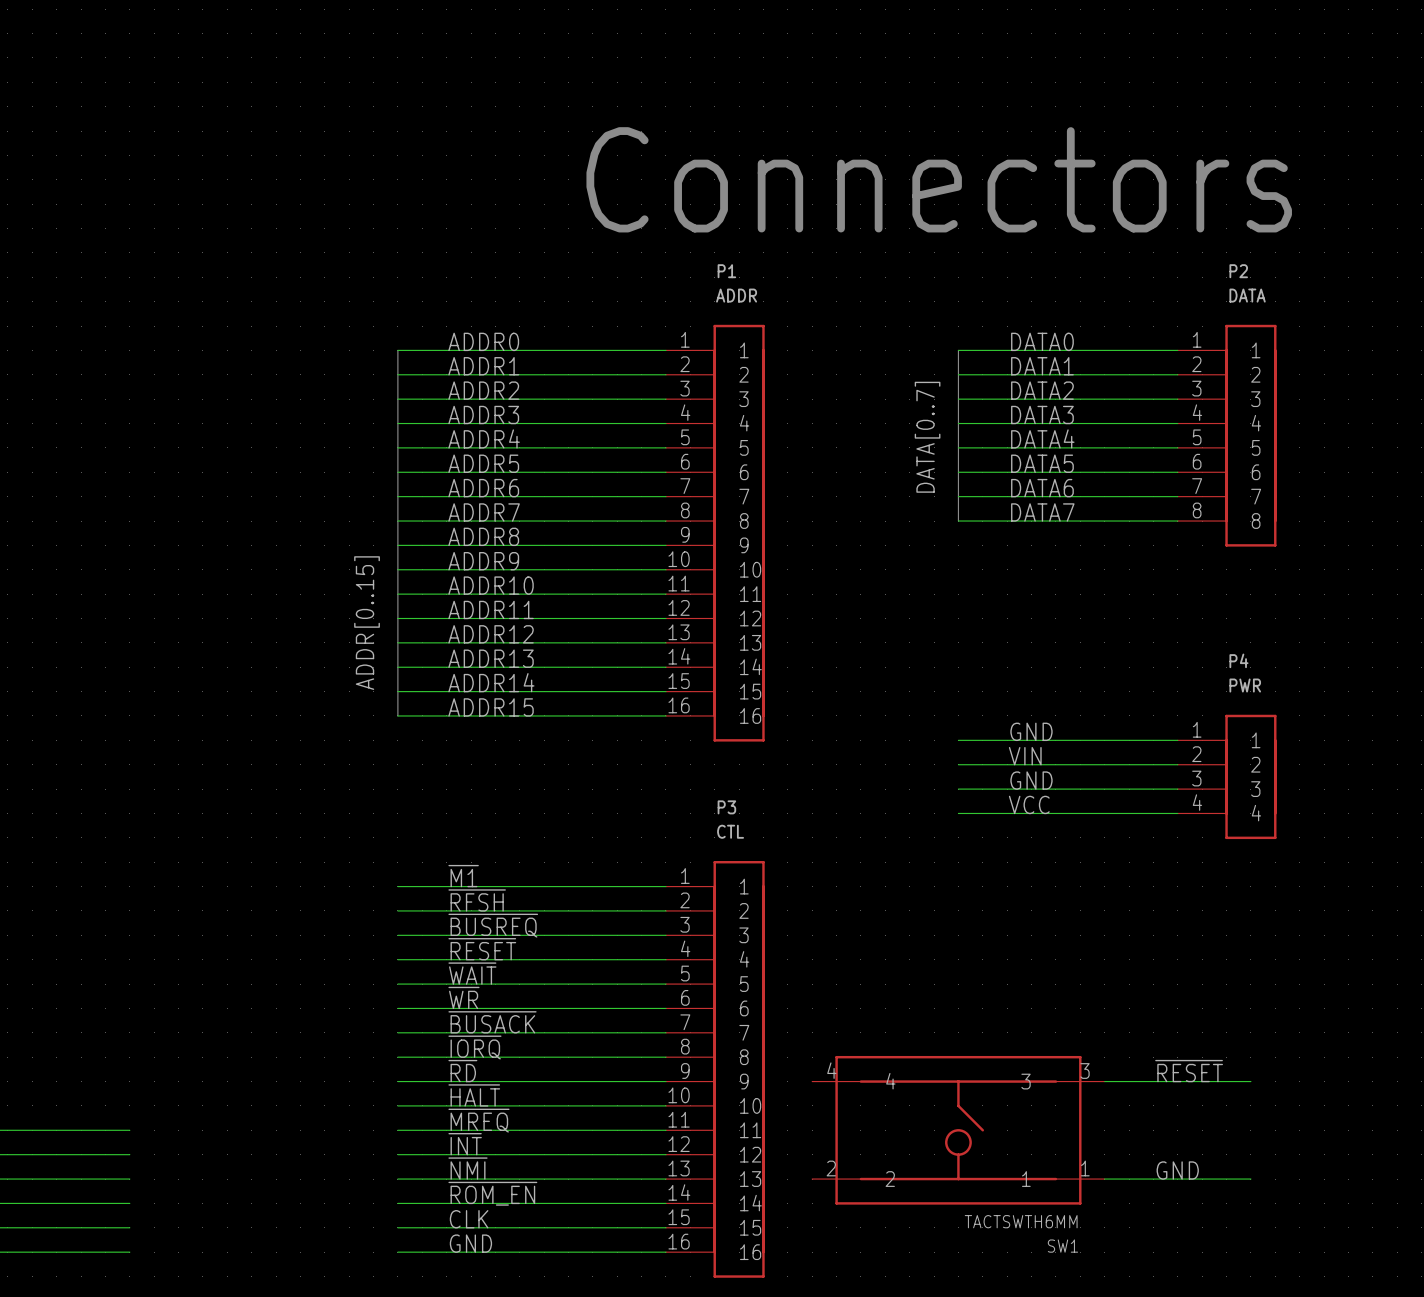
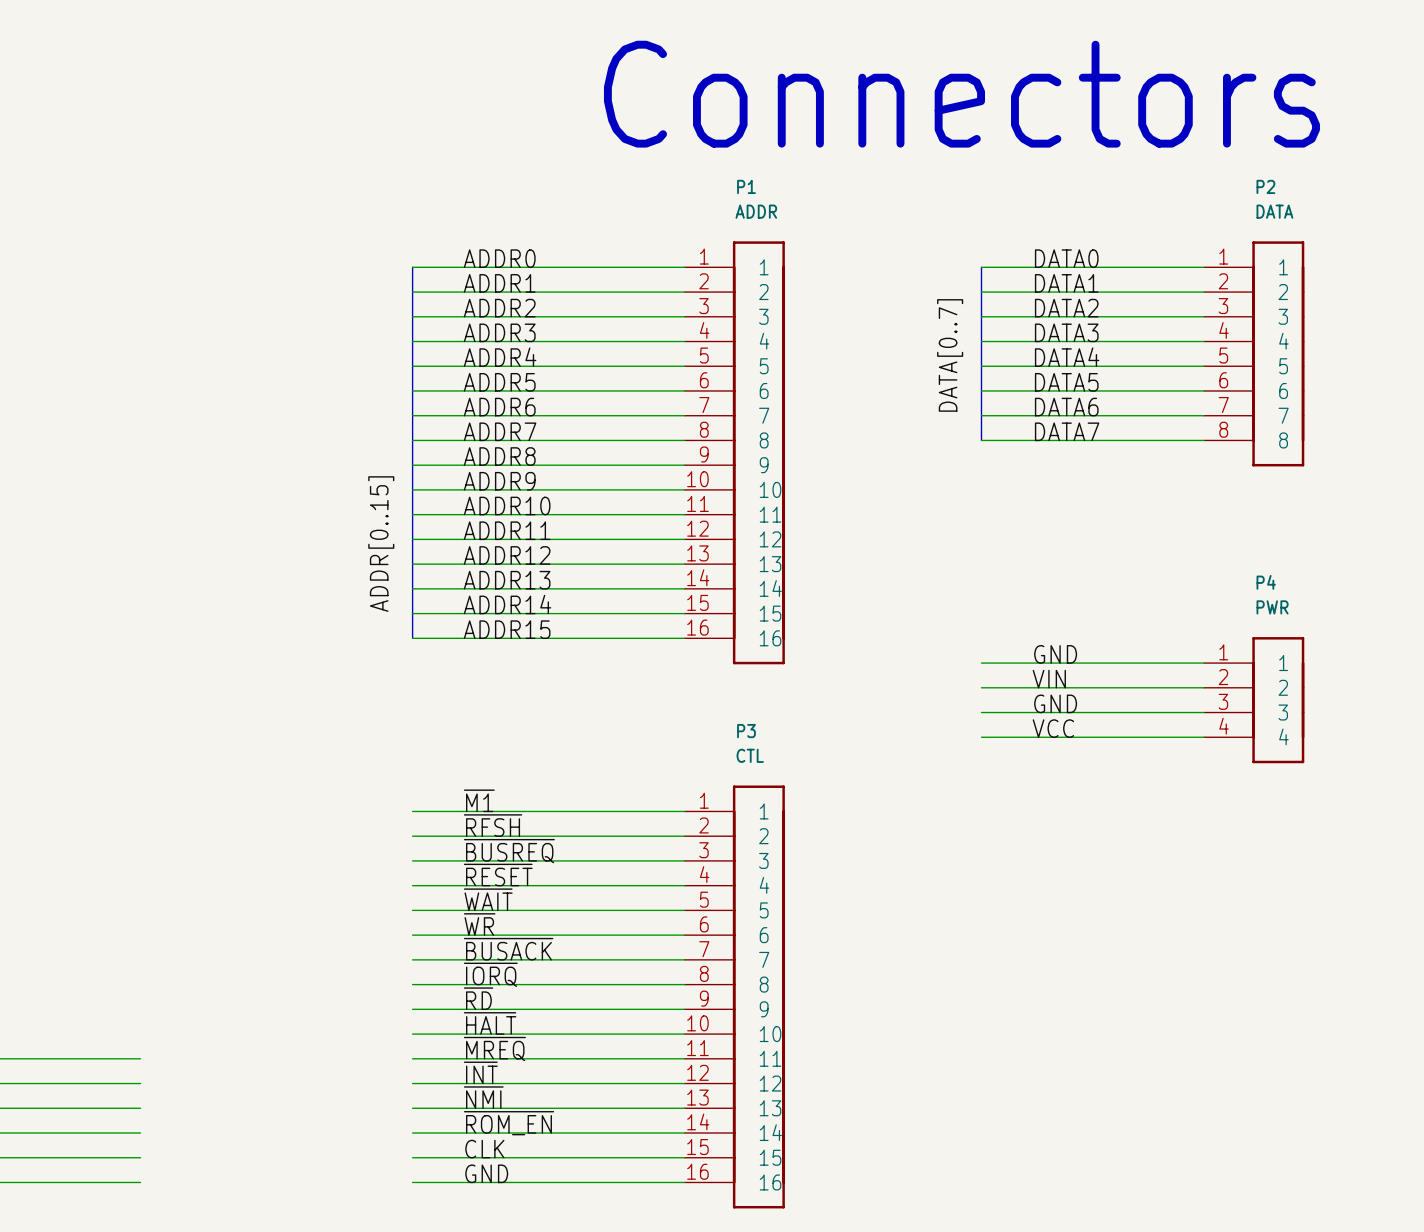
label: ~{RESET} (1189, 1071) -> none
wire: (1104, 1081) (1250, 1081) -> none
SW1: TACTSWTH6MM (958, 1130) -> none
label: GND (1177, 1170) -> none
wire: (1104, 1179) (1250, 1179) -> none

